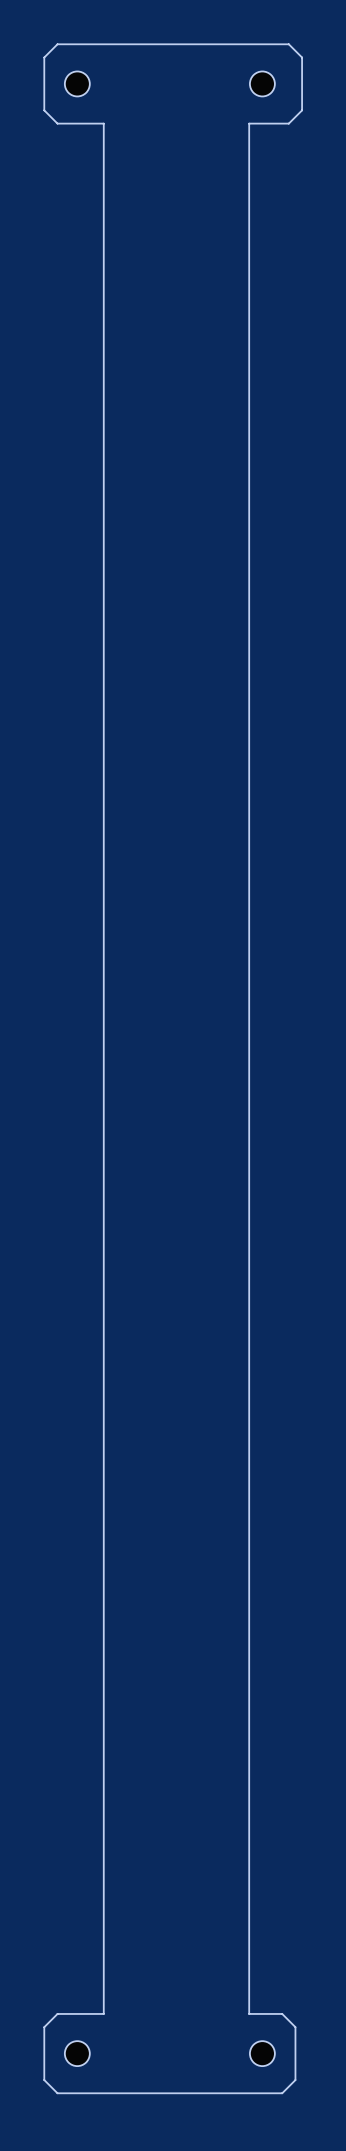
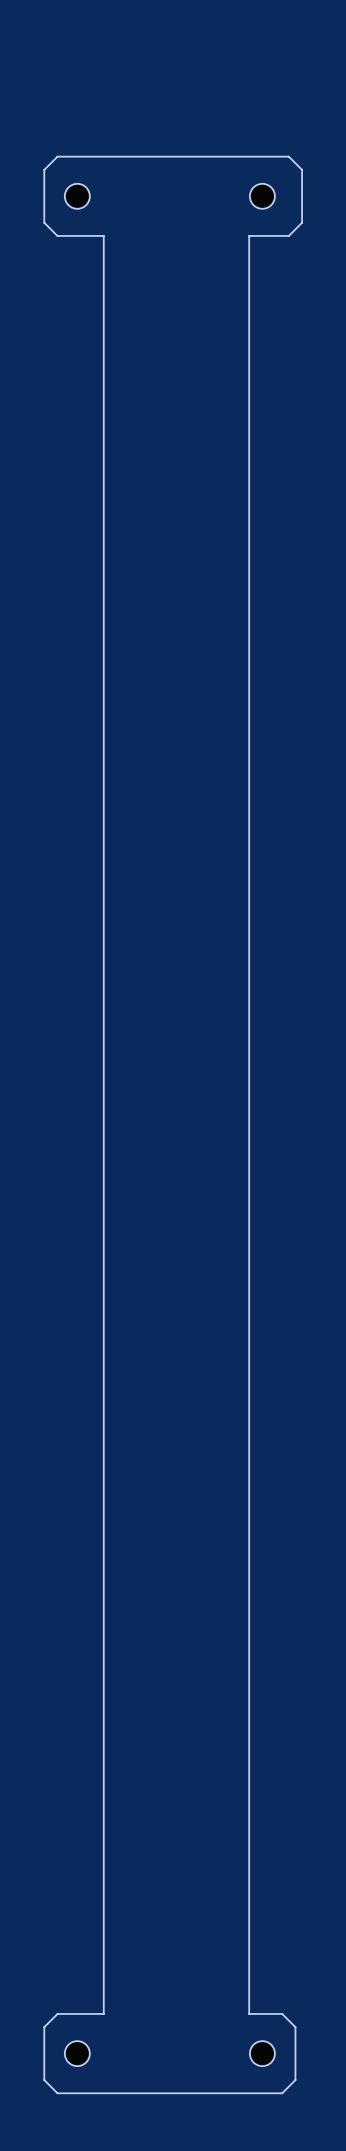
hole: (77, 83) -> none
hole: (262, 83) -> none
hole: none -> (77, 196)
hole: none -> (262, 196)
board edge: (249, 235) (249, 123) (288, 123) (302, 110) (302, 57) (288, 44) (57, 44) (44, 57) (44, 110) (57, 123) (103, 123) (103, 235) -> (249, 235) (288, 235) (302, 222) (302, 169) (288, 156) (57, 156) (44, 169) (44, 222) (57, 235) (103, 235)

